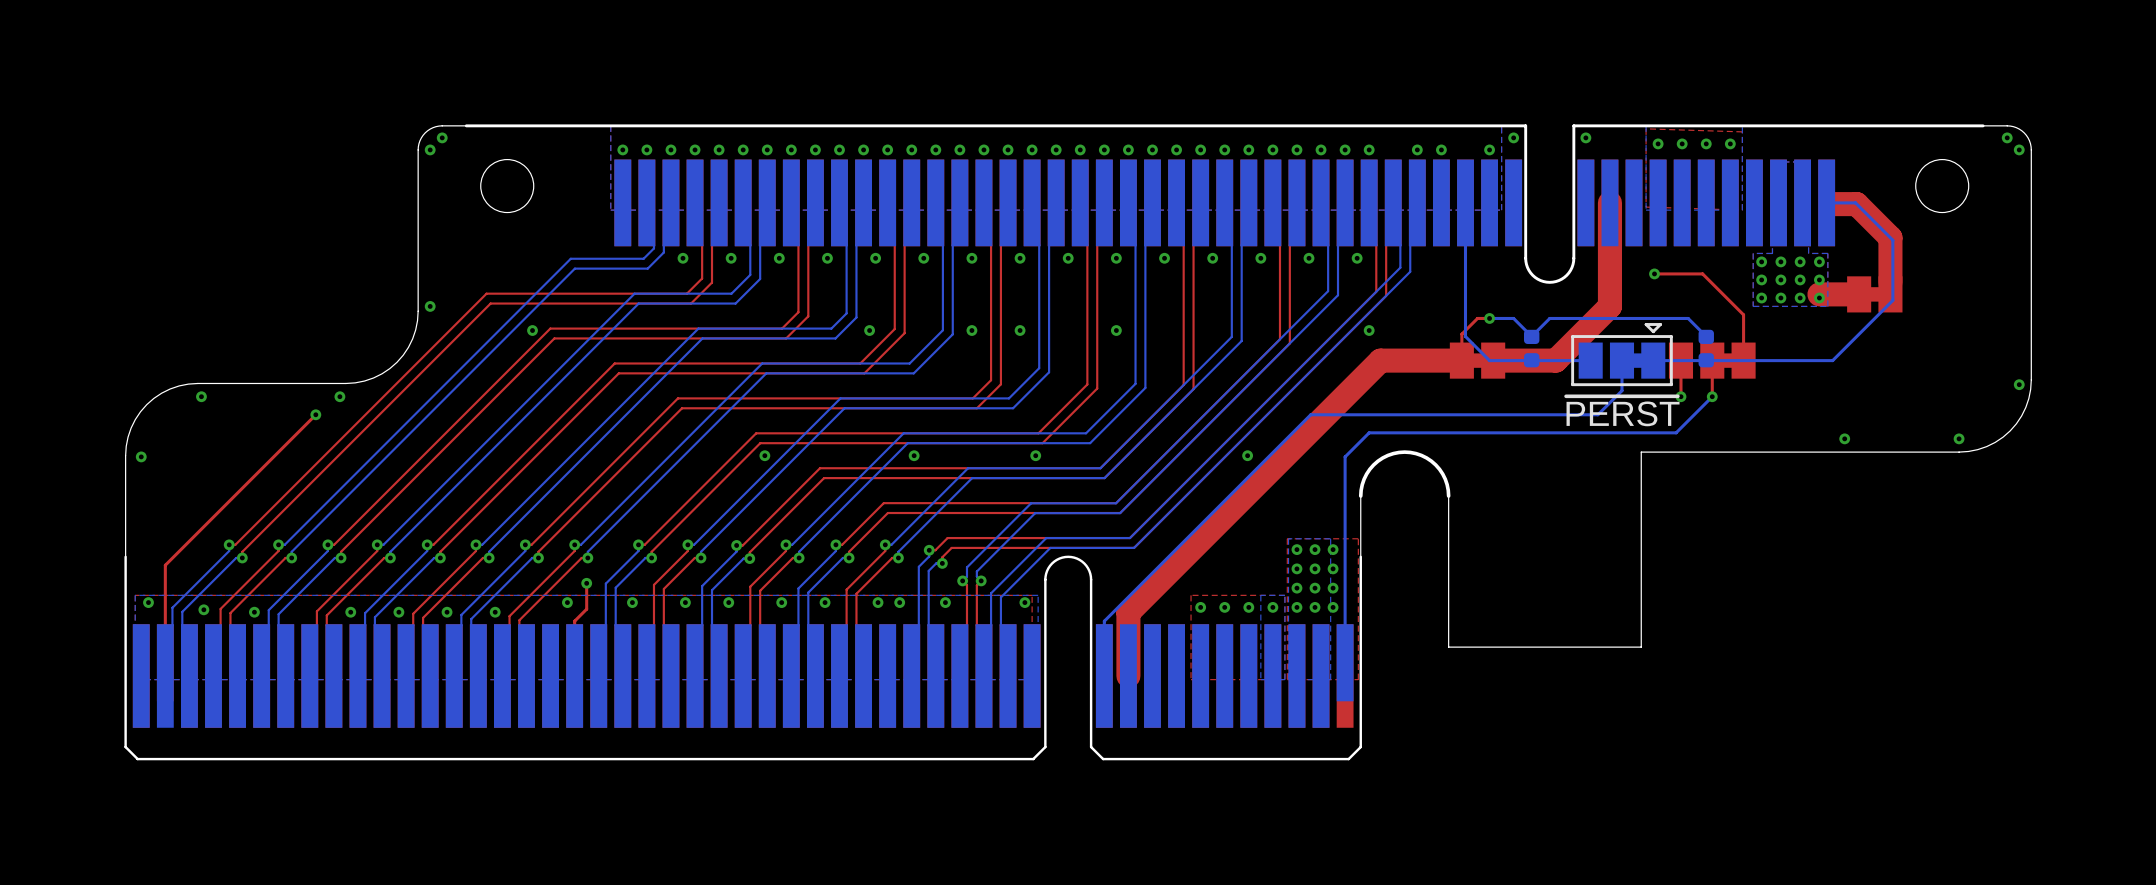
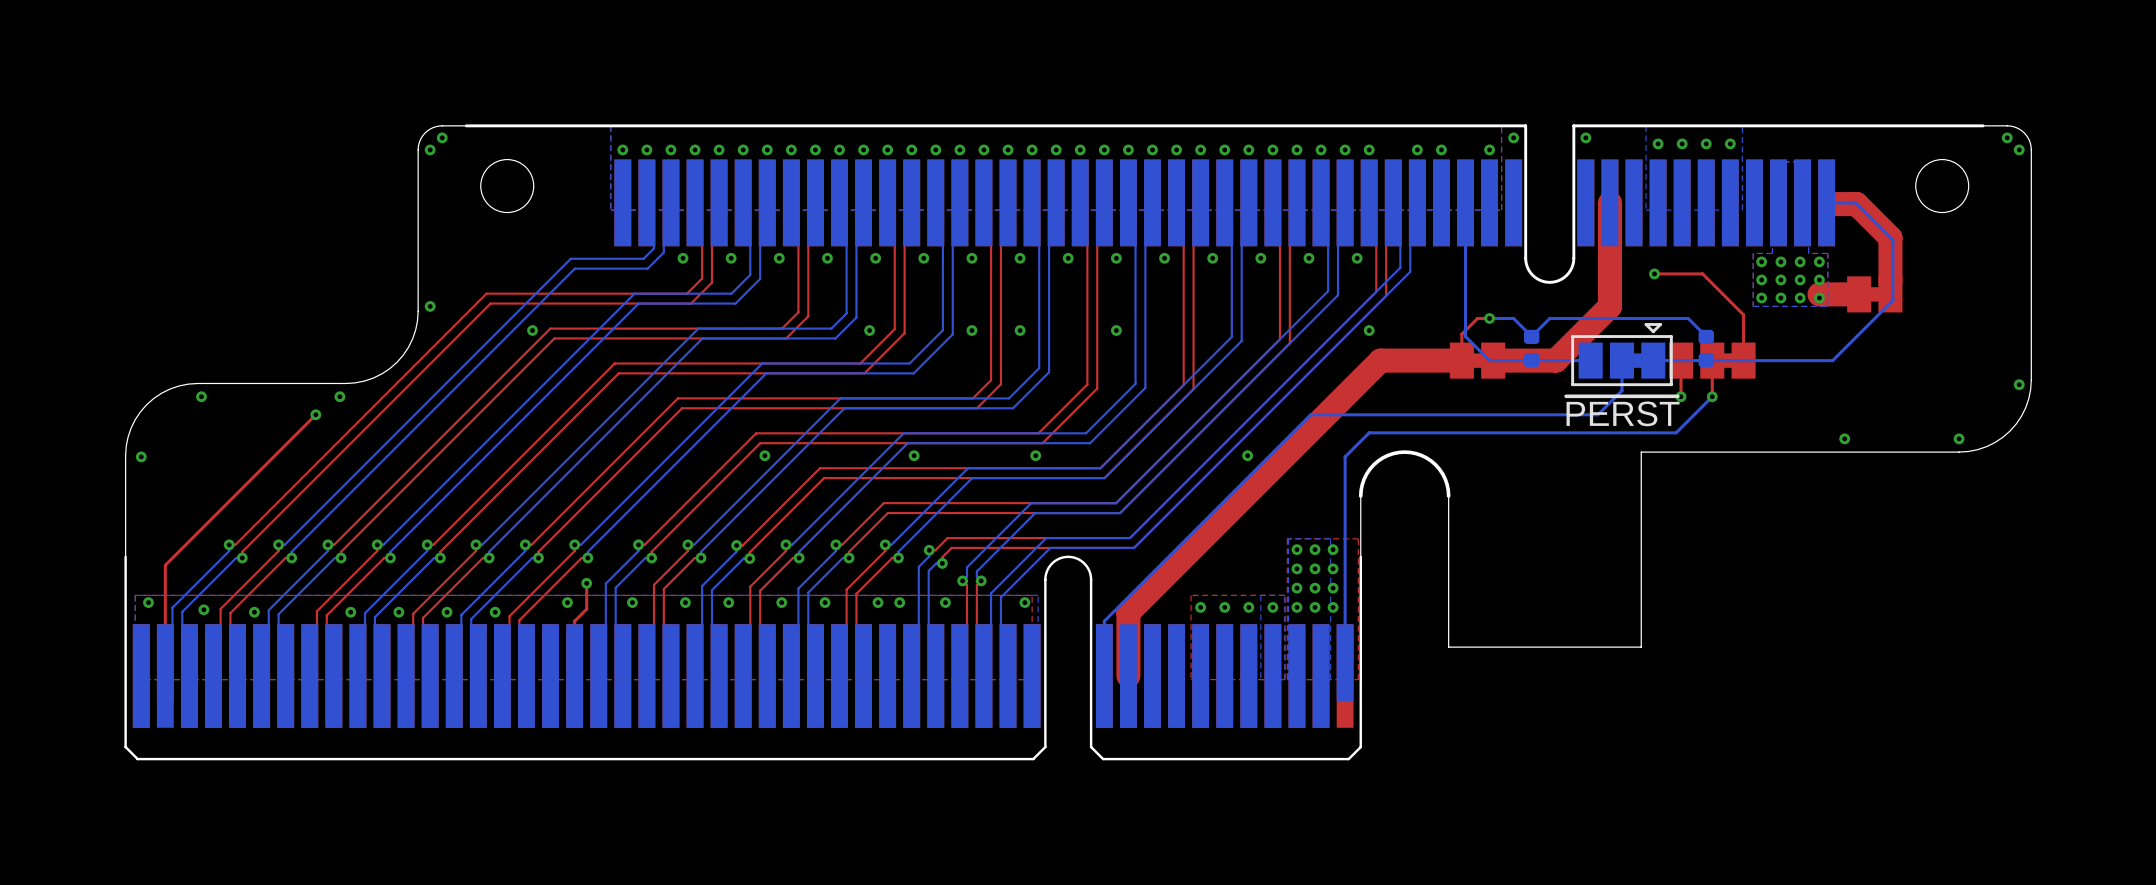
top zone outline: (1646, 128) (1742, 131) (1742, 210) (1646, 207) (1646, 128) -> none

